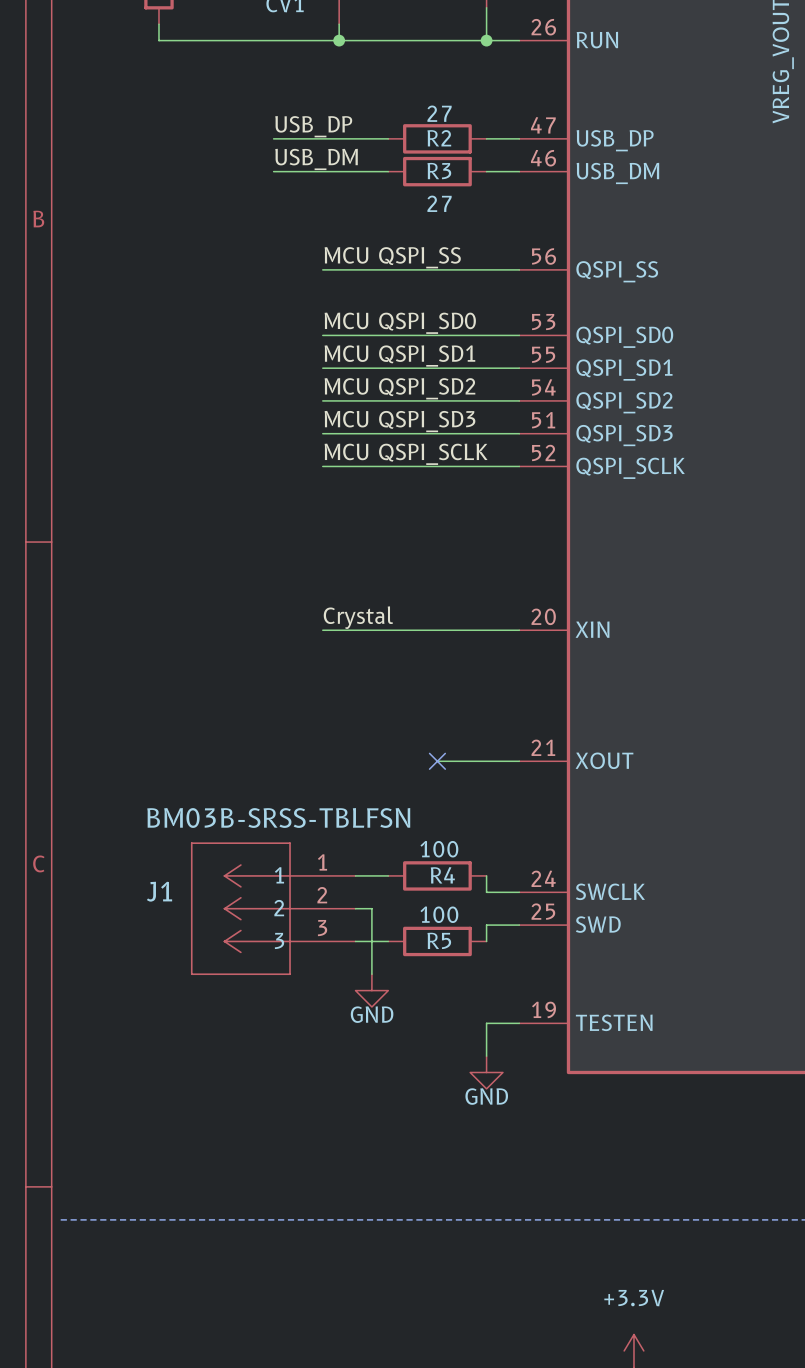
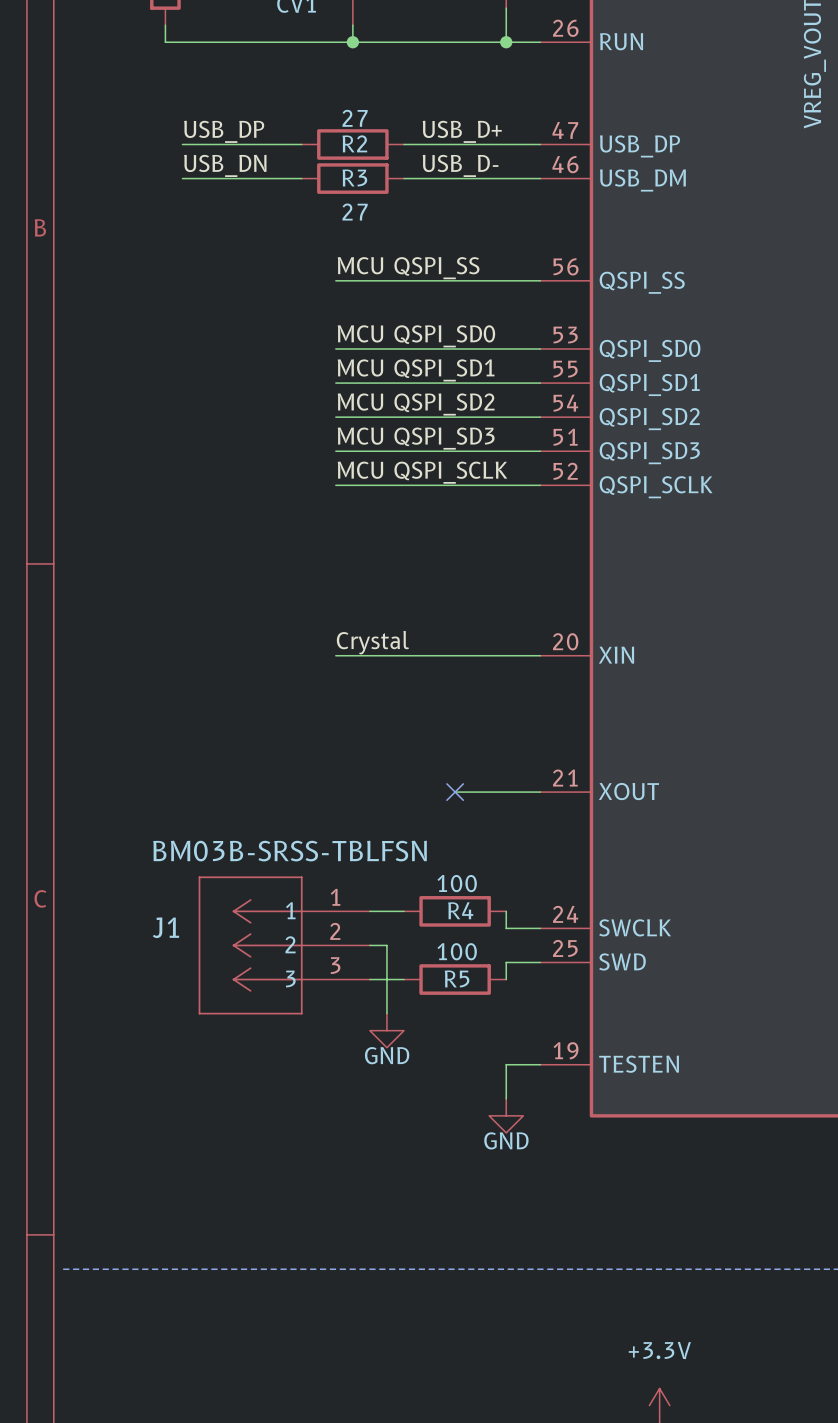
label position: USB_DP (313, 126) -> USB_DP (224, 131)
label: none -> USB_D+ (462, 131)
wire: none -> (182, 144) (284, 144)
wire: (290, 138) (388, 138) -> (506, 144) (404, 144)
R2 position: (437, 138) -> (352, 144)
label: USB_DM (316, 159) -> USB_DN (225, 165)
label: none -> USB_D- (460, 165)
wire: none -> (182, 178) (284, 178)
wire: (290, 171) (388, 171) -> (506, 178) (404, 178)
R3 position: (437, 171) -> (352, 178)

